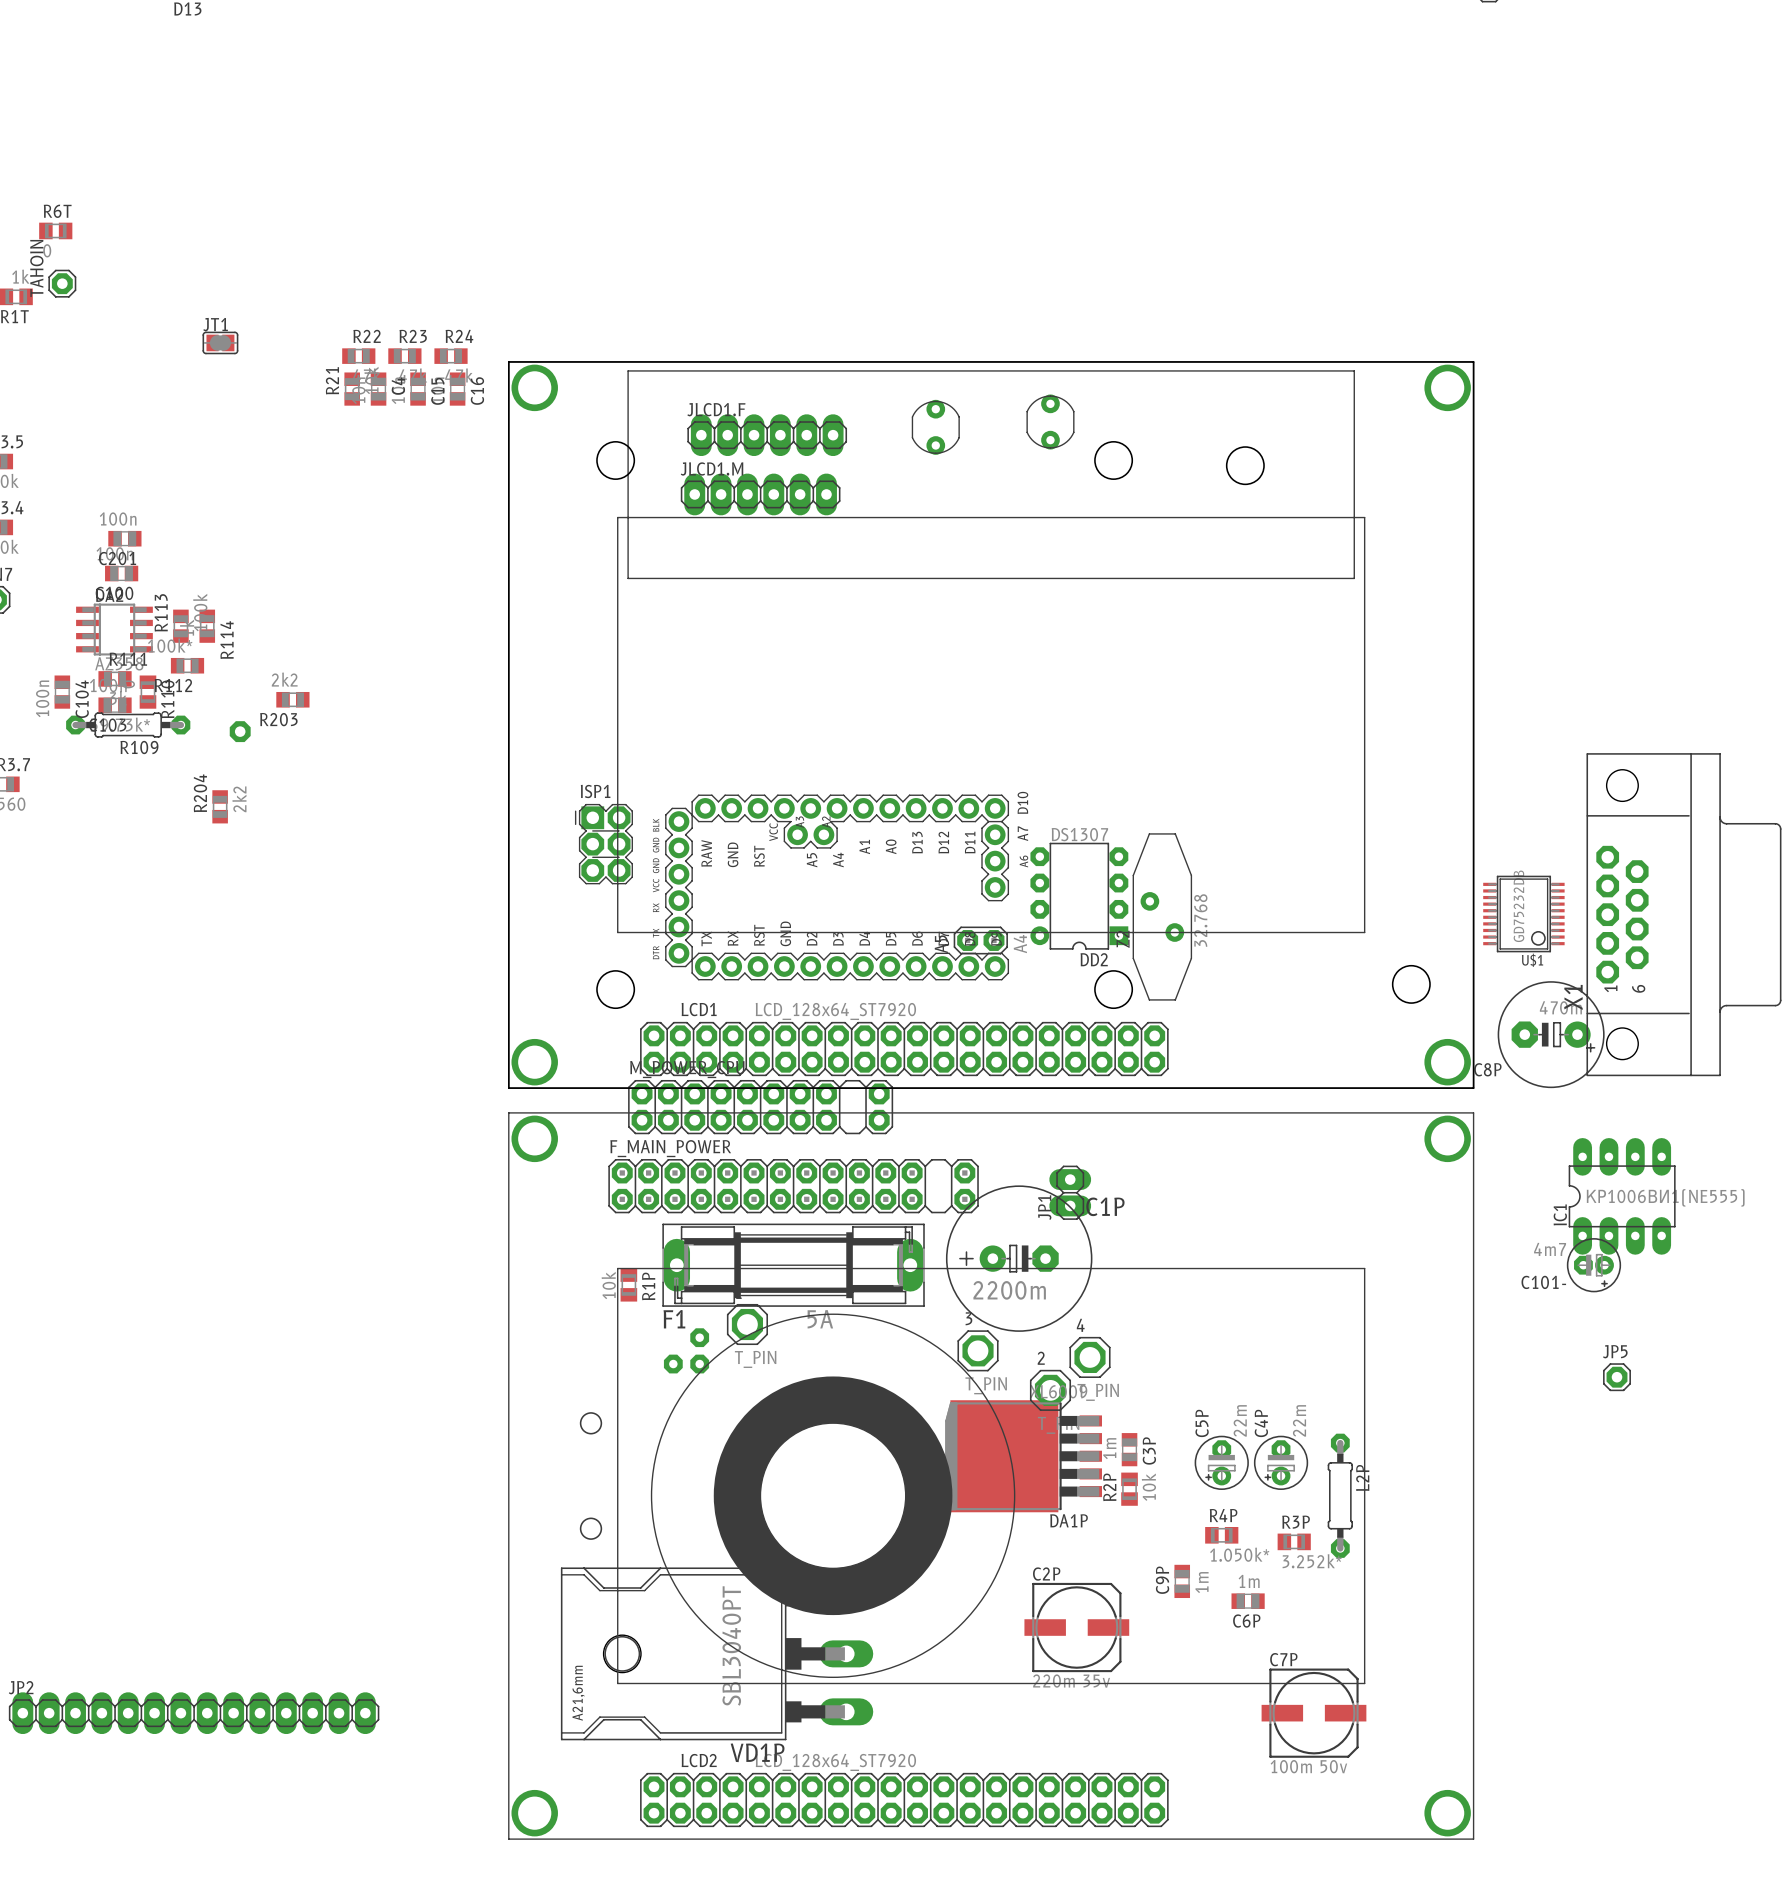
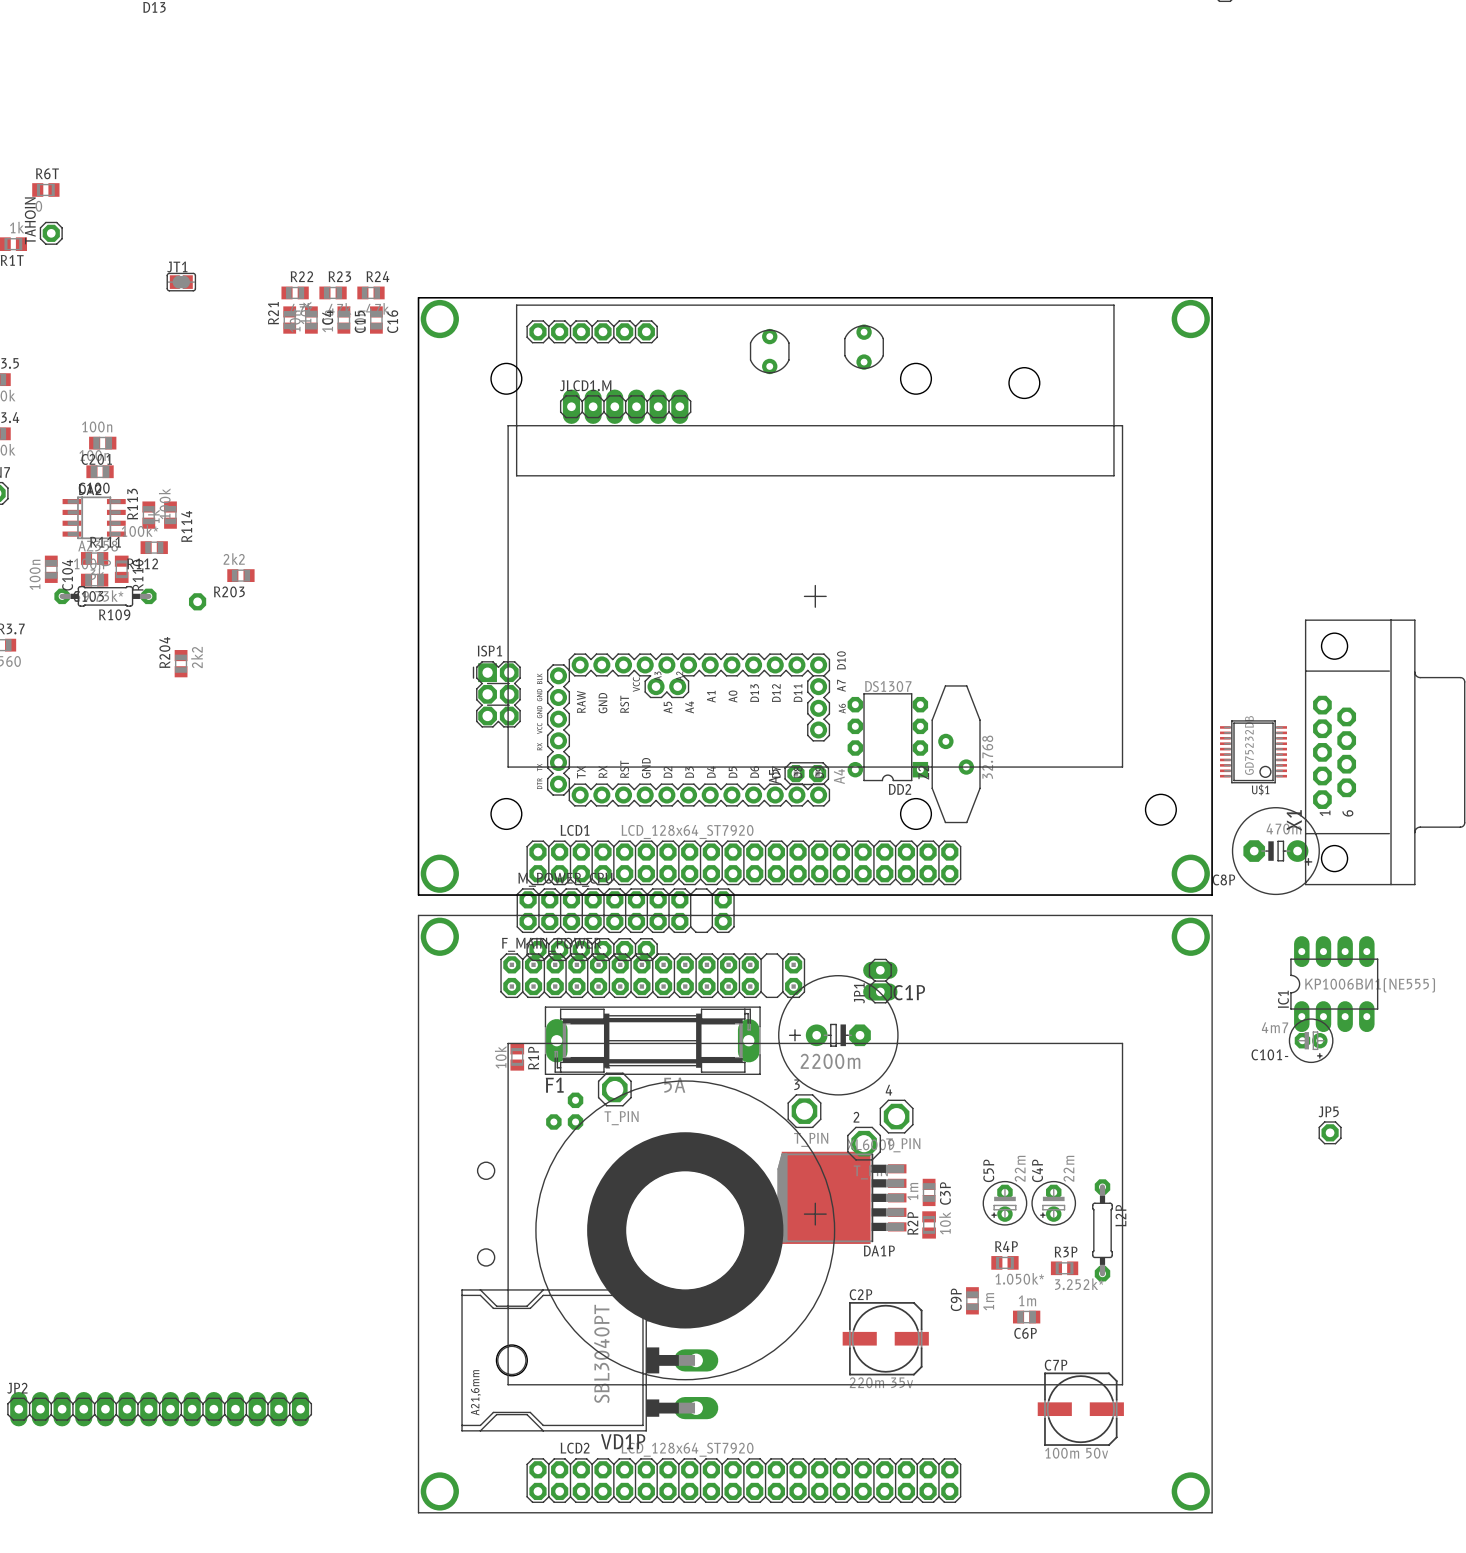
LCD1 footprint: [508, 361, 1475, 1089] -> [417, 297, 1213, 896]
JLCD1.F: (767, 435) -> none
LCD2 footprint: [508, 1112, 1475, 1840] -> [417, 914, 1213, 1514]

